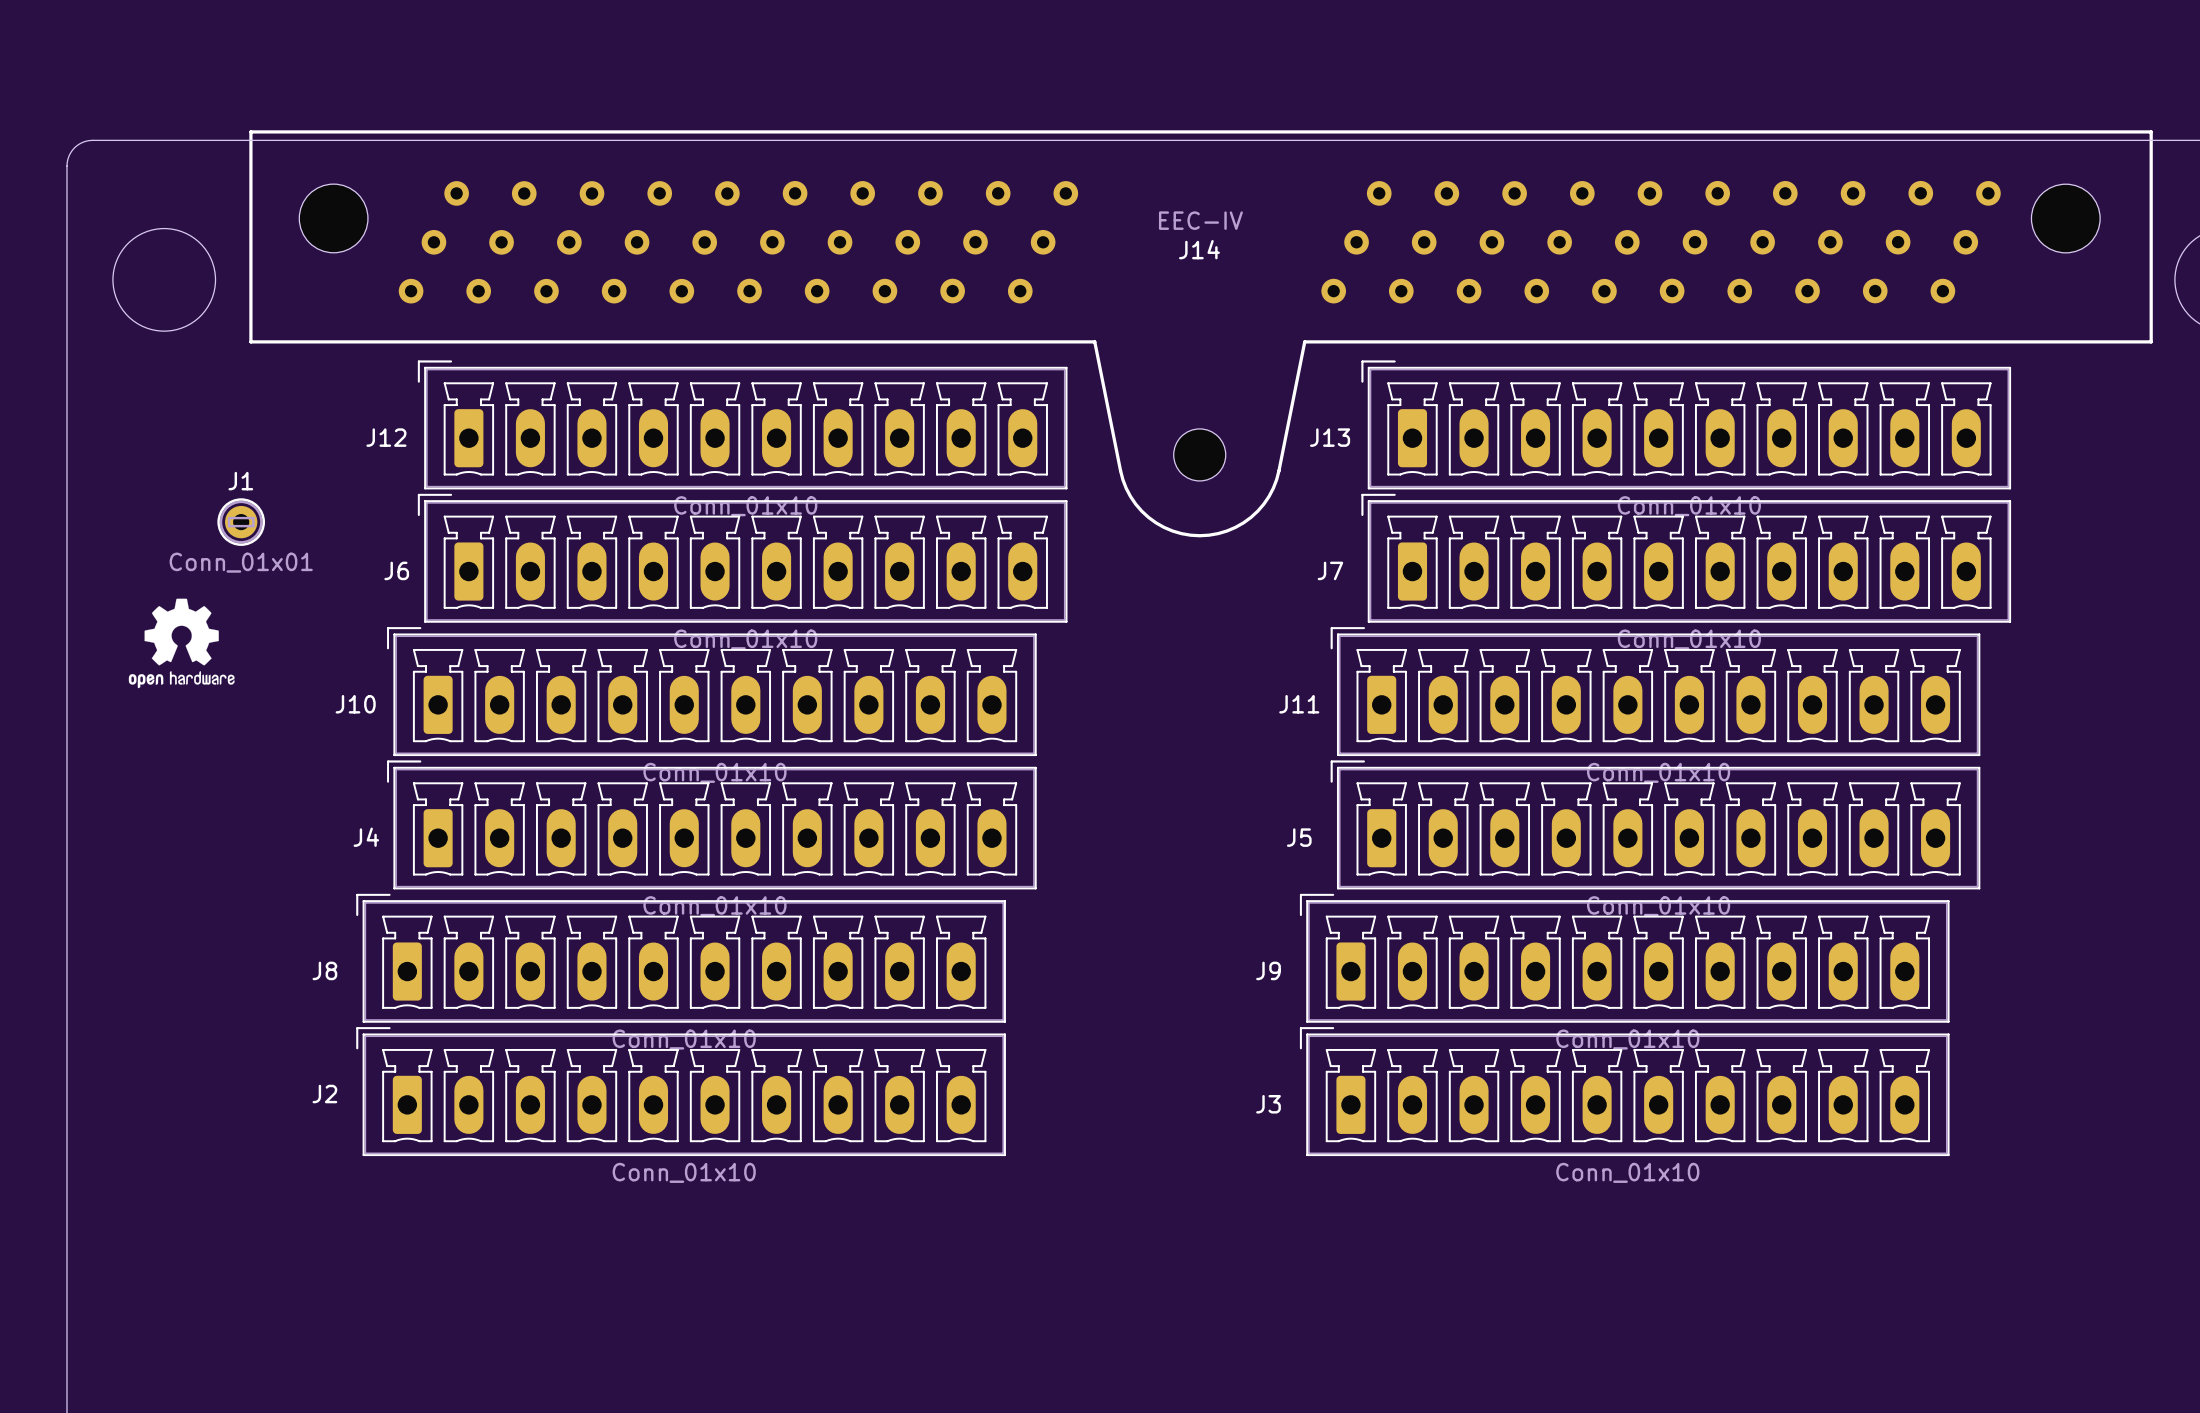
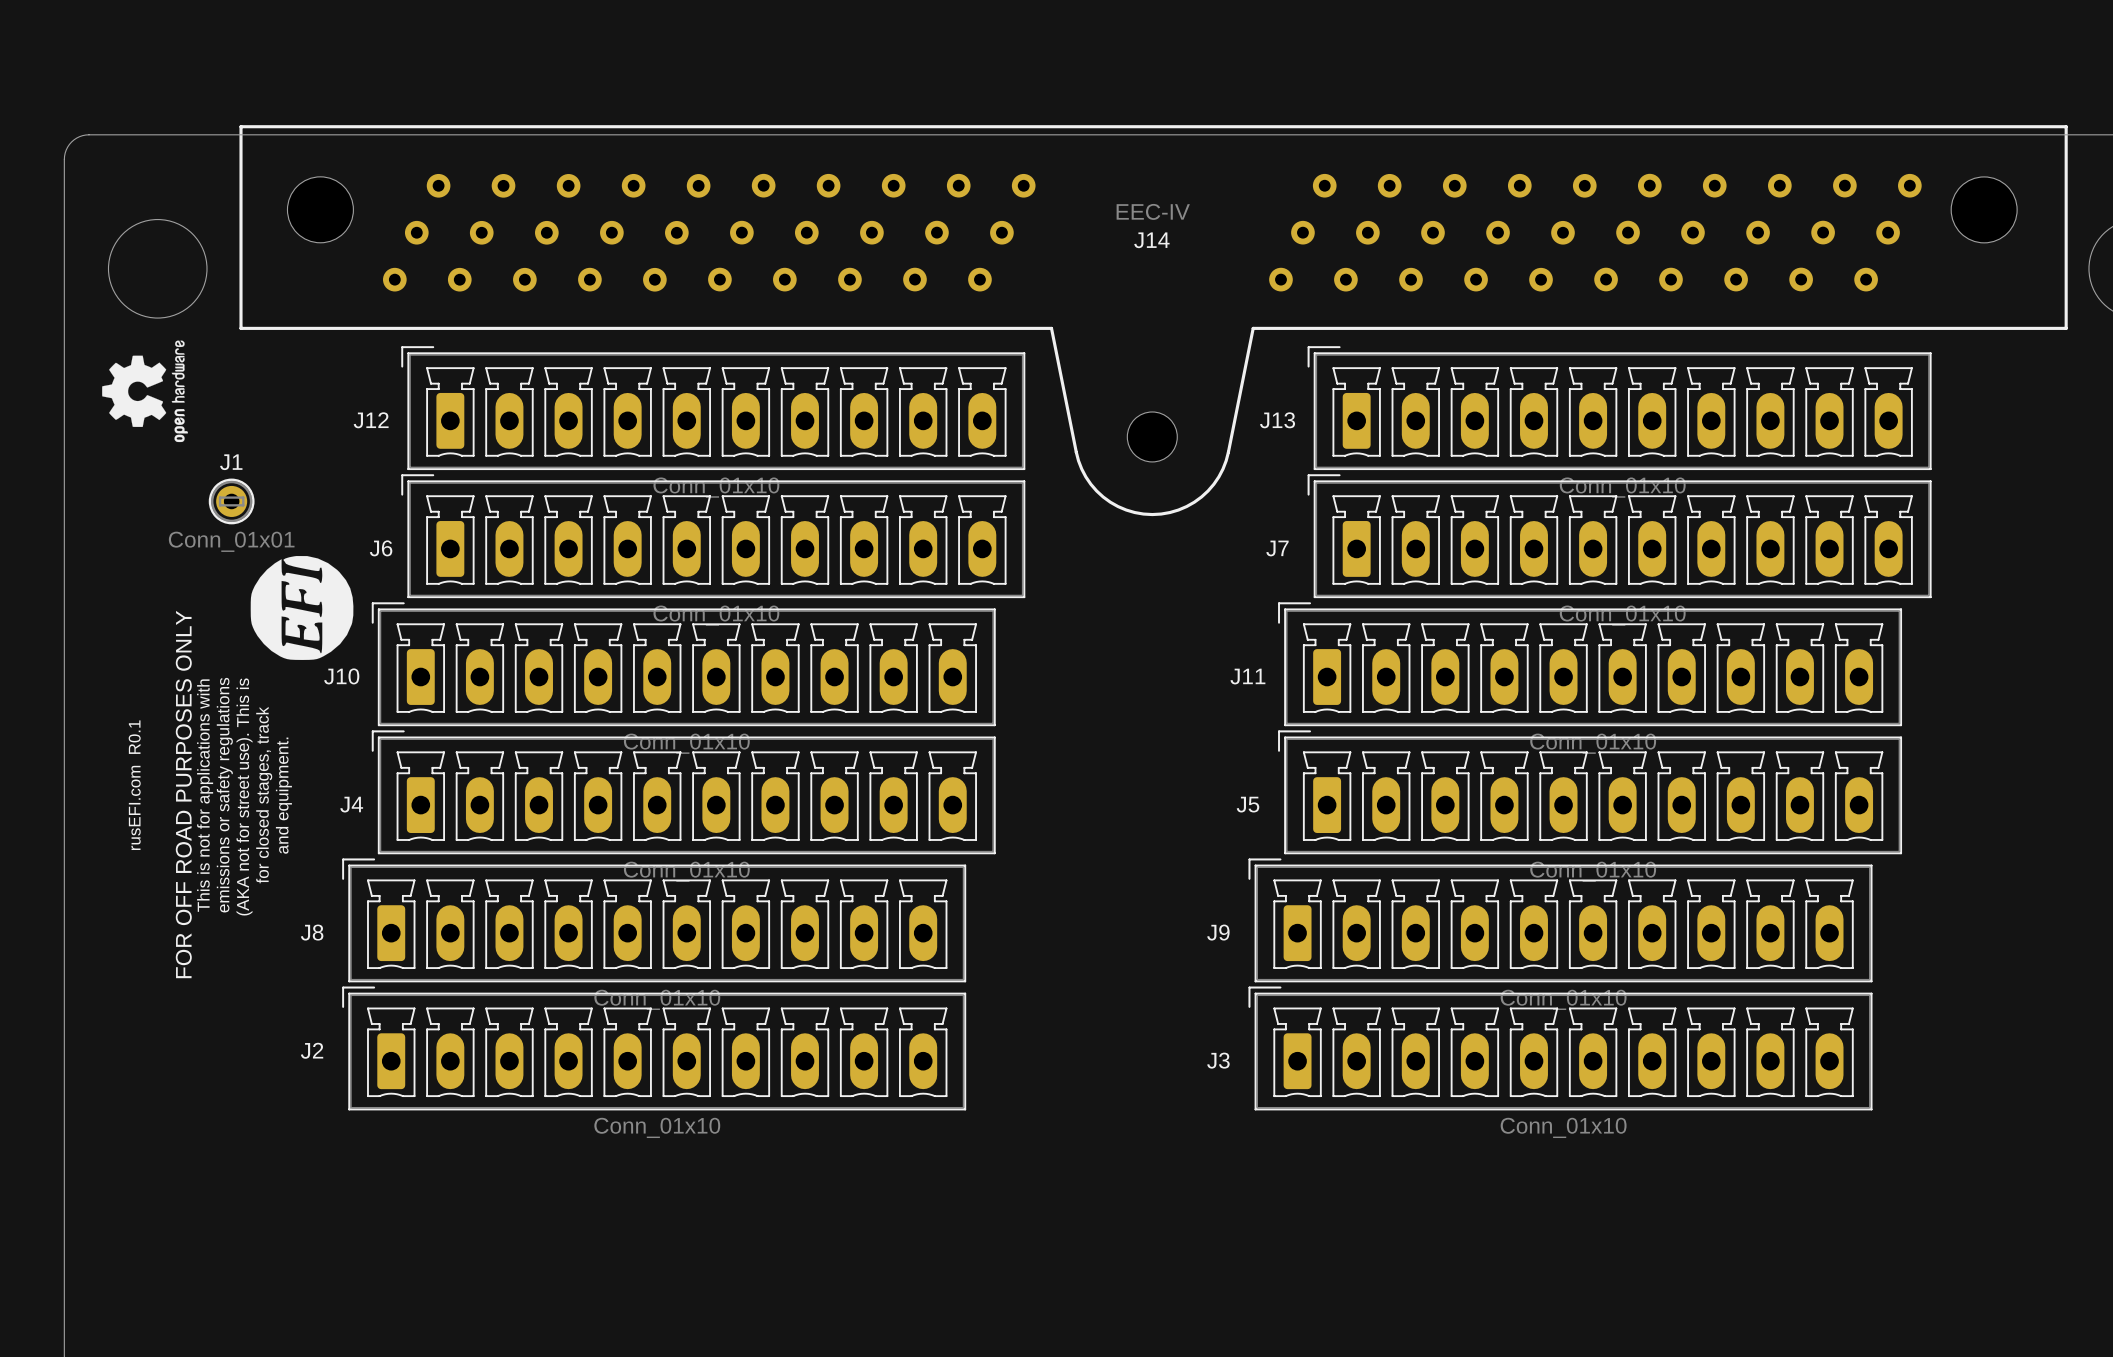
drawing: none -> [102, 340, 189, 443]
drawing: none -> [250, 556, 354, 660]
drawing: [128, 598, 235, 689] -> none
text: none -> rusEFI.com R0.1 (134, 785)

